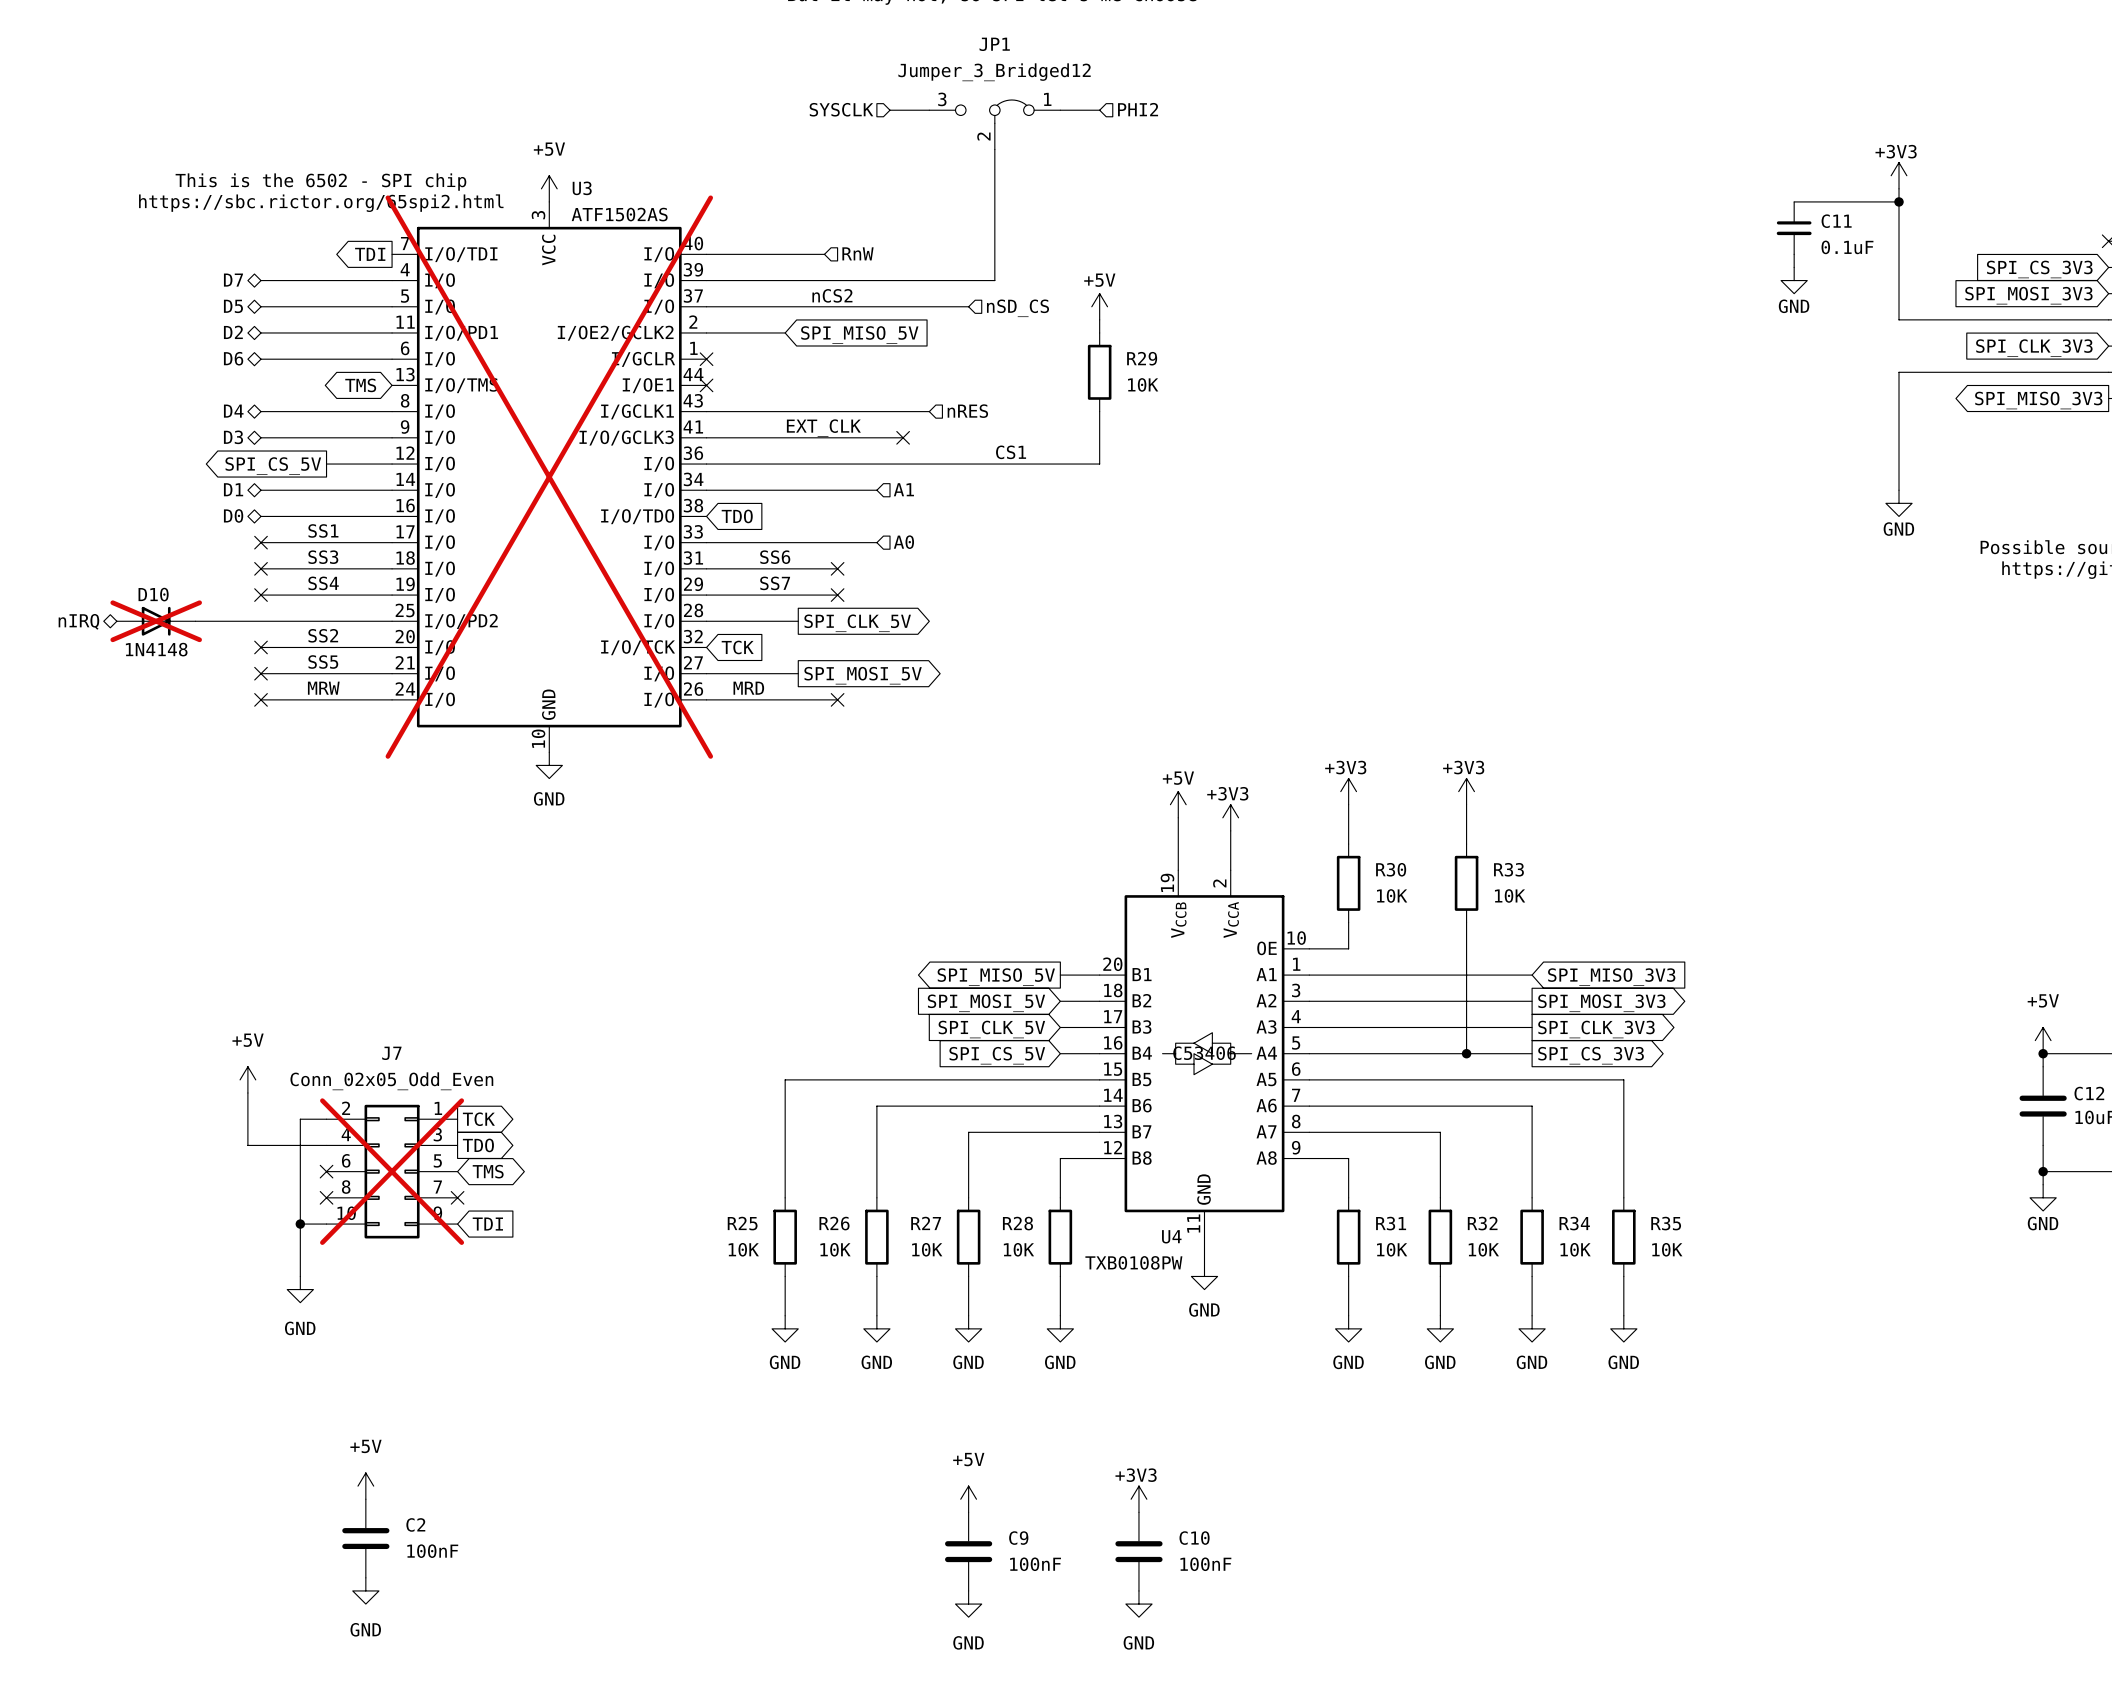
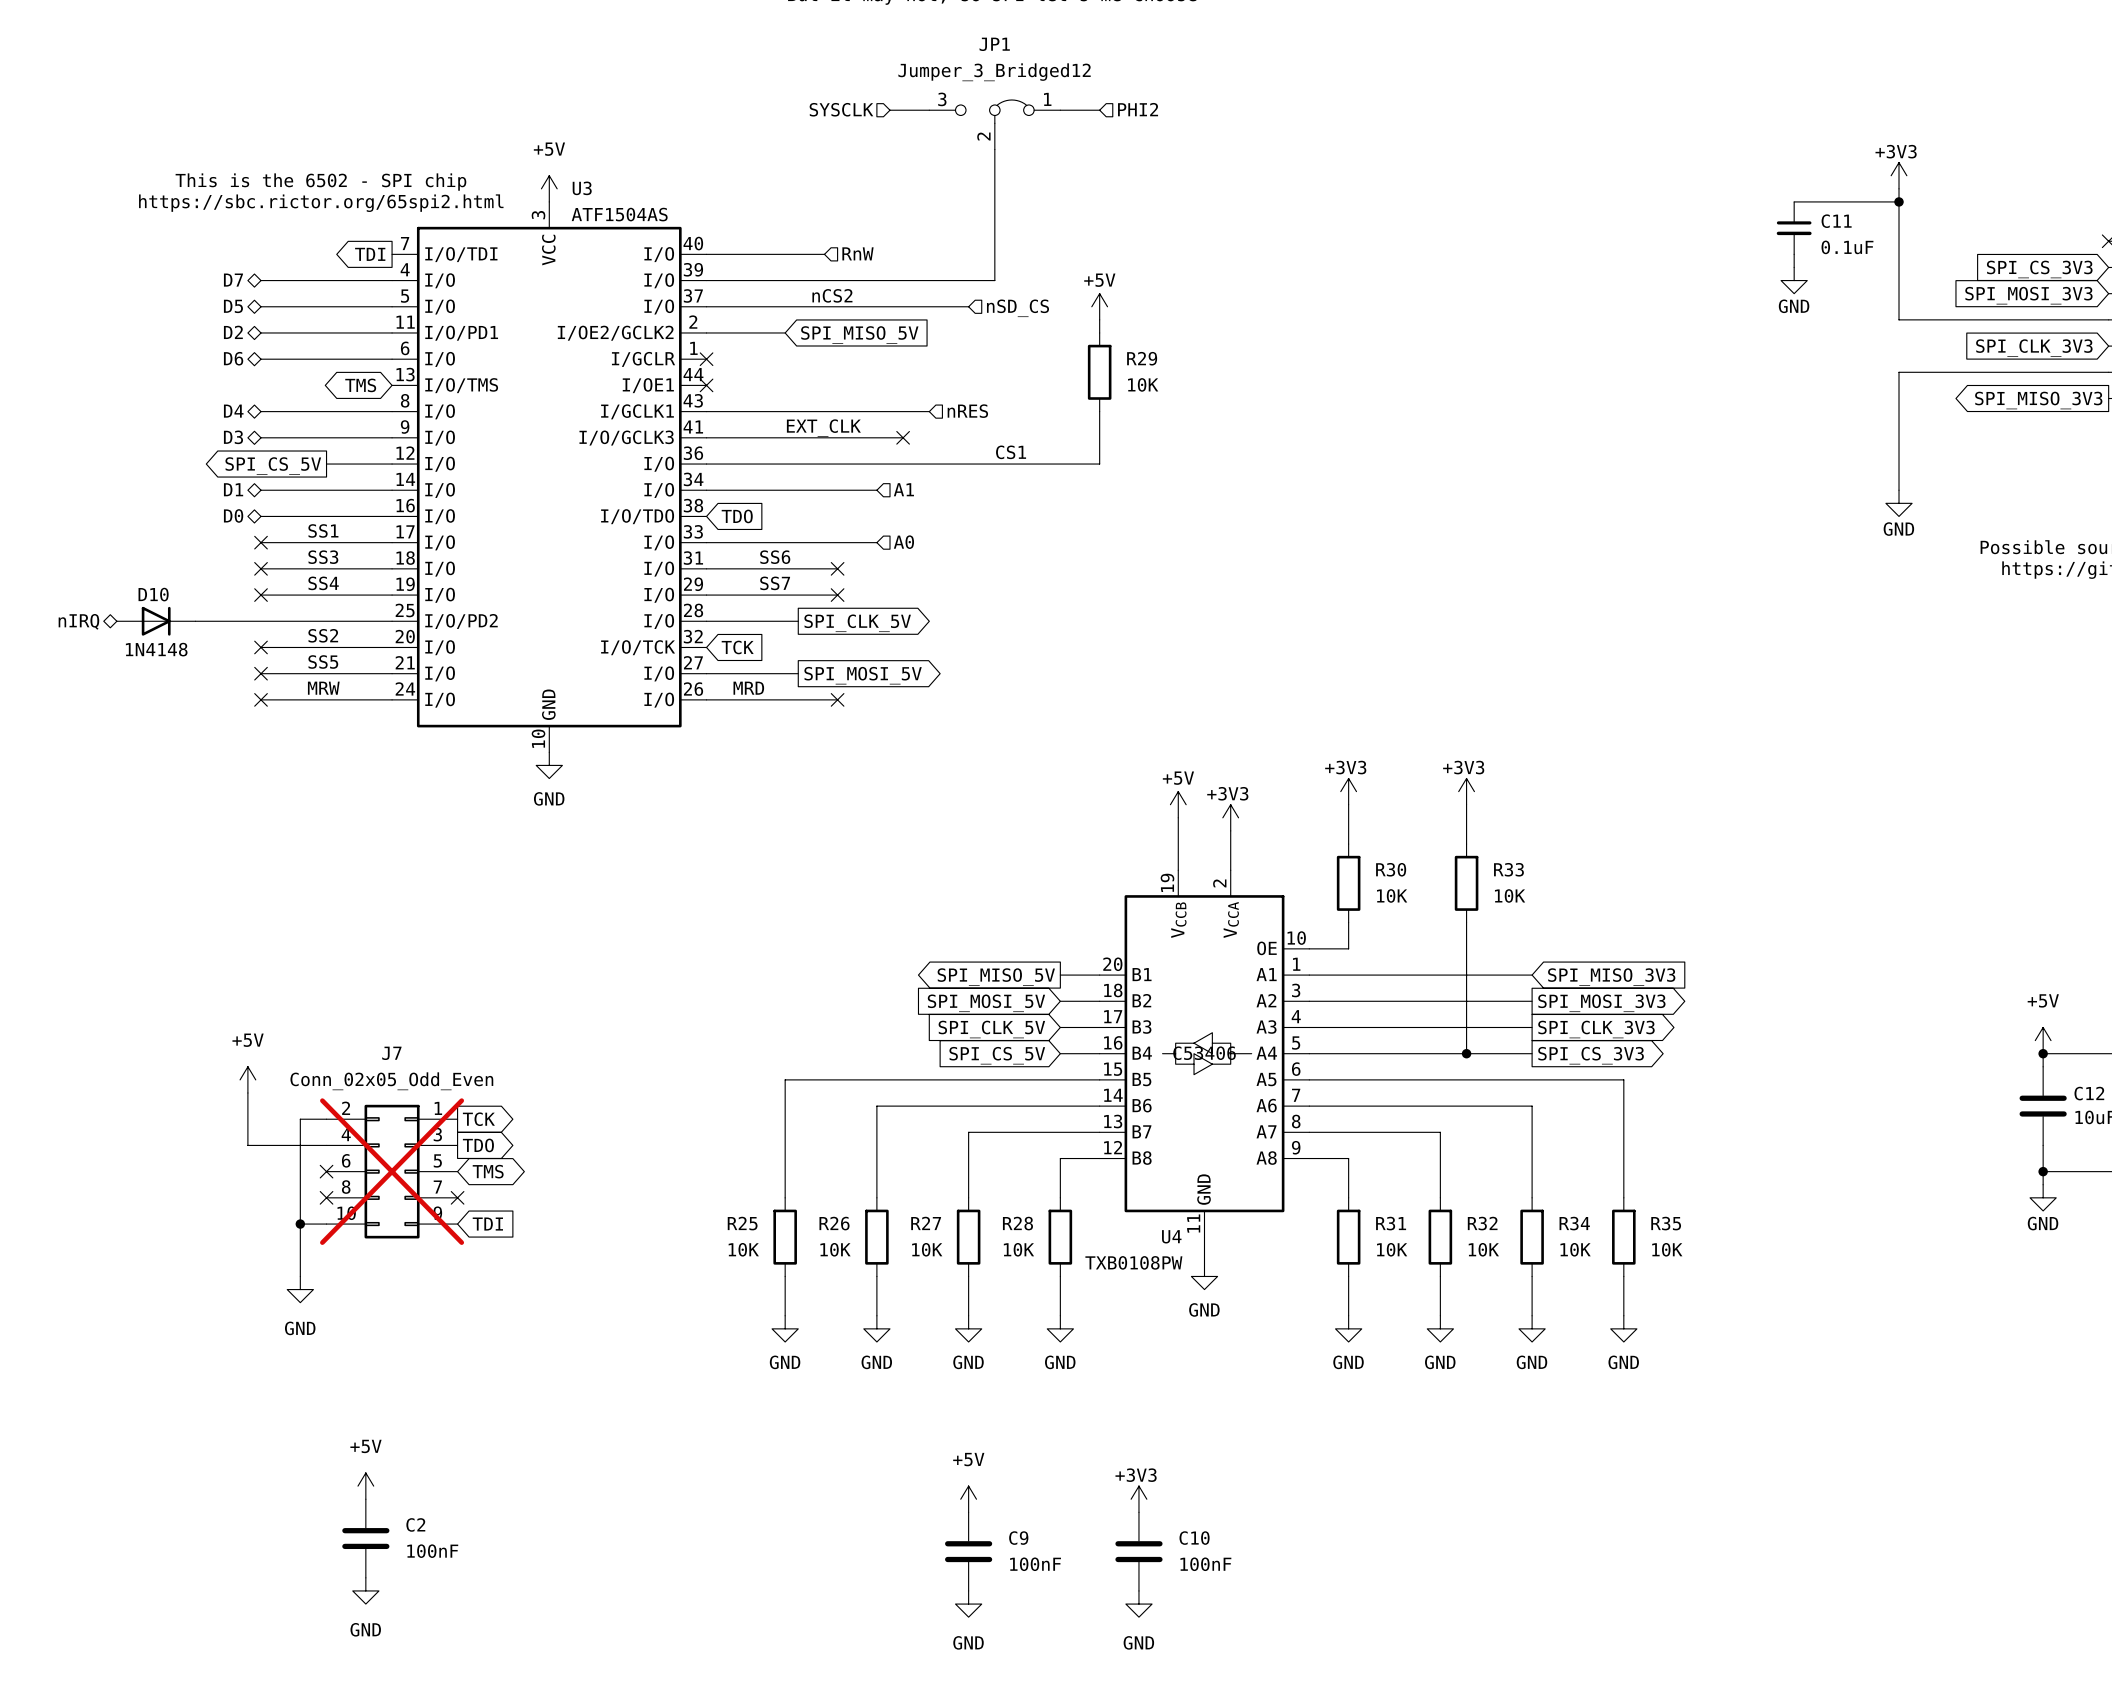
U3 value: ATF1502AS (619, 214) -> ATF1504AS (619, 214)
U3 do-not-place cross: (549, 477) -> none
D10 do-not-place cross: (156, 621) -> none

